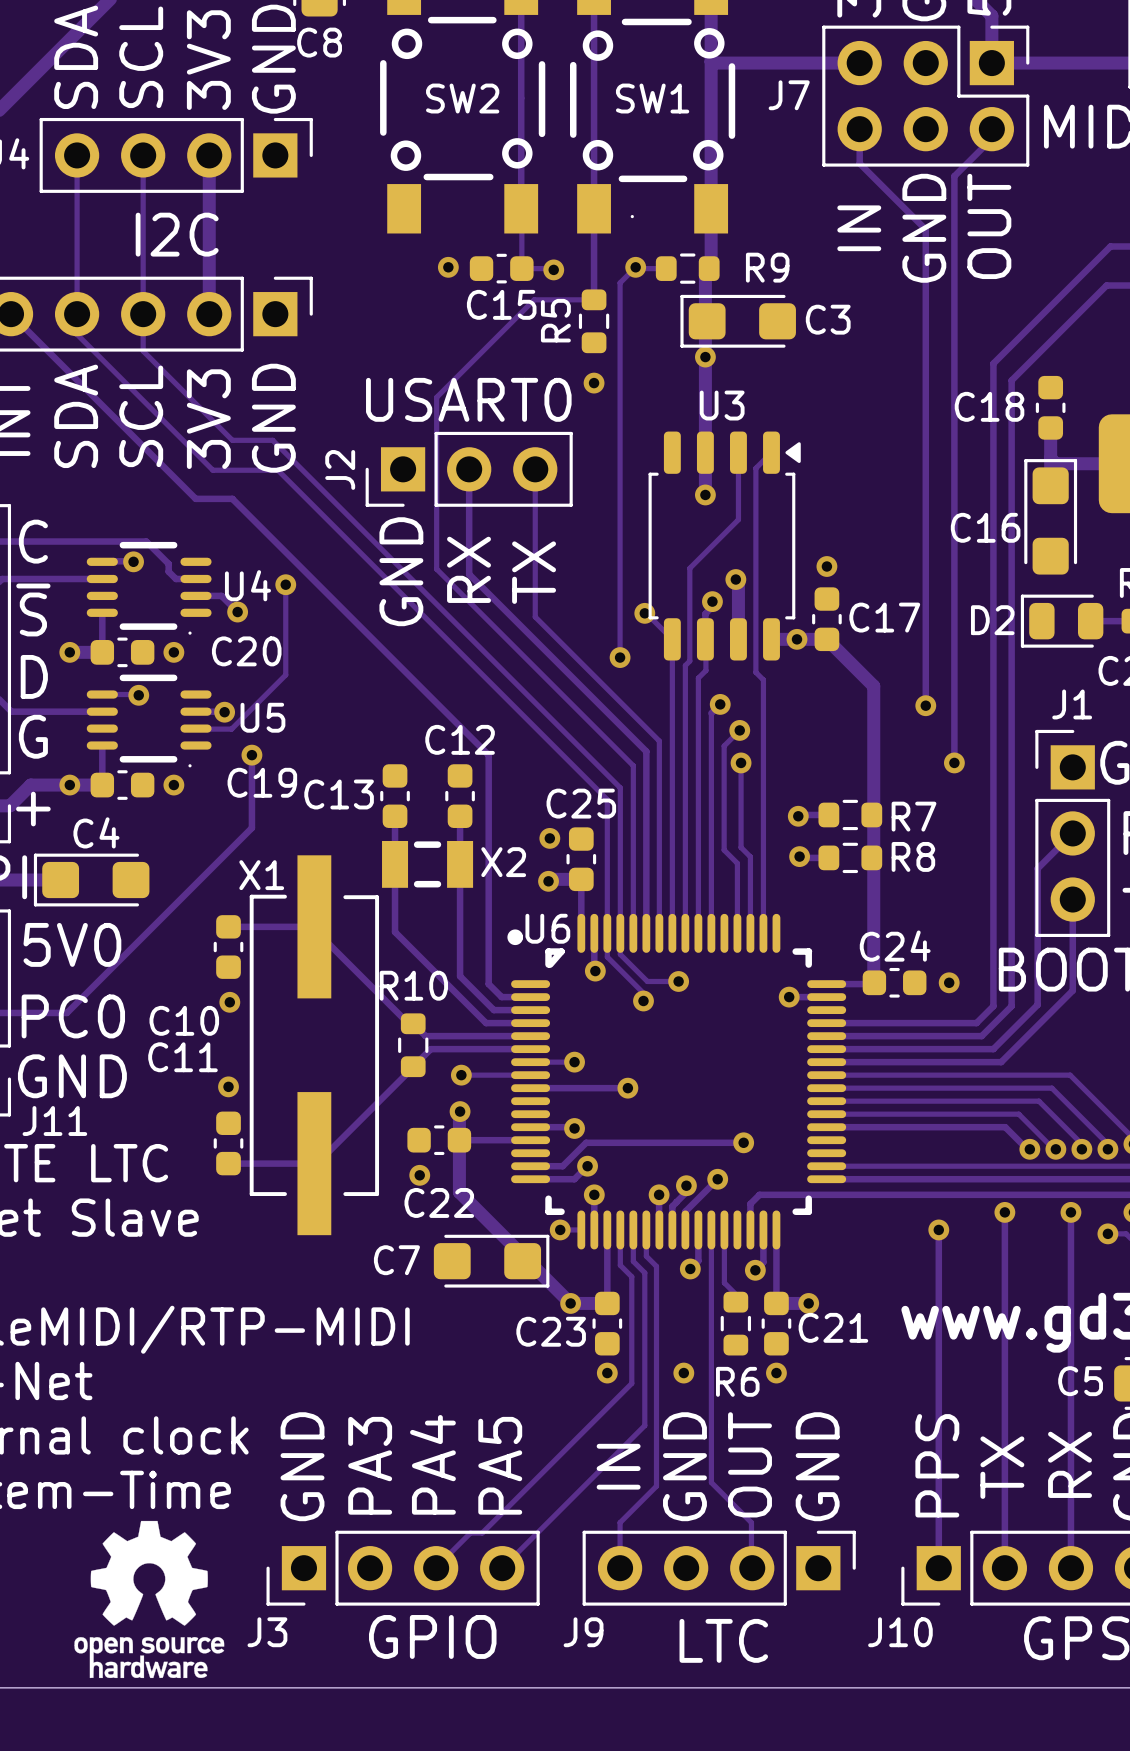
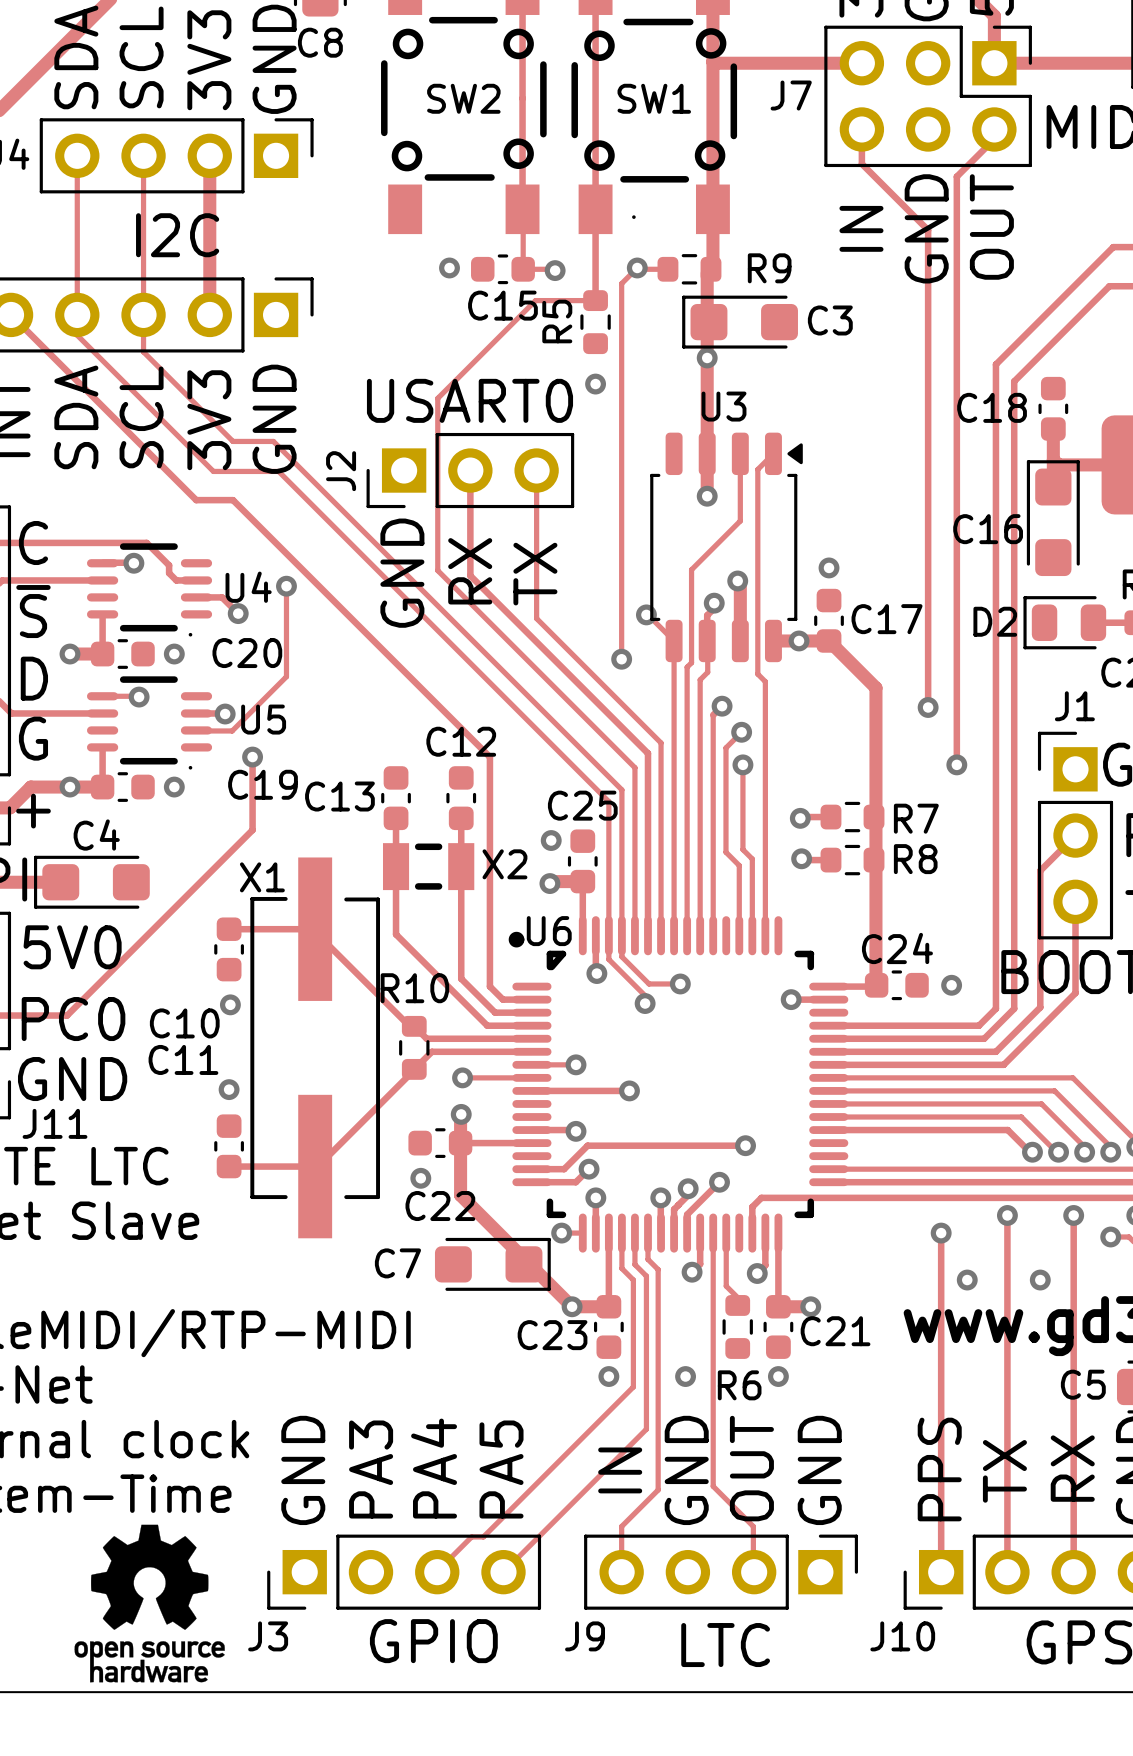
via: none -> (967, 1280)
via: none -> (1040, 1280)

